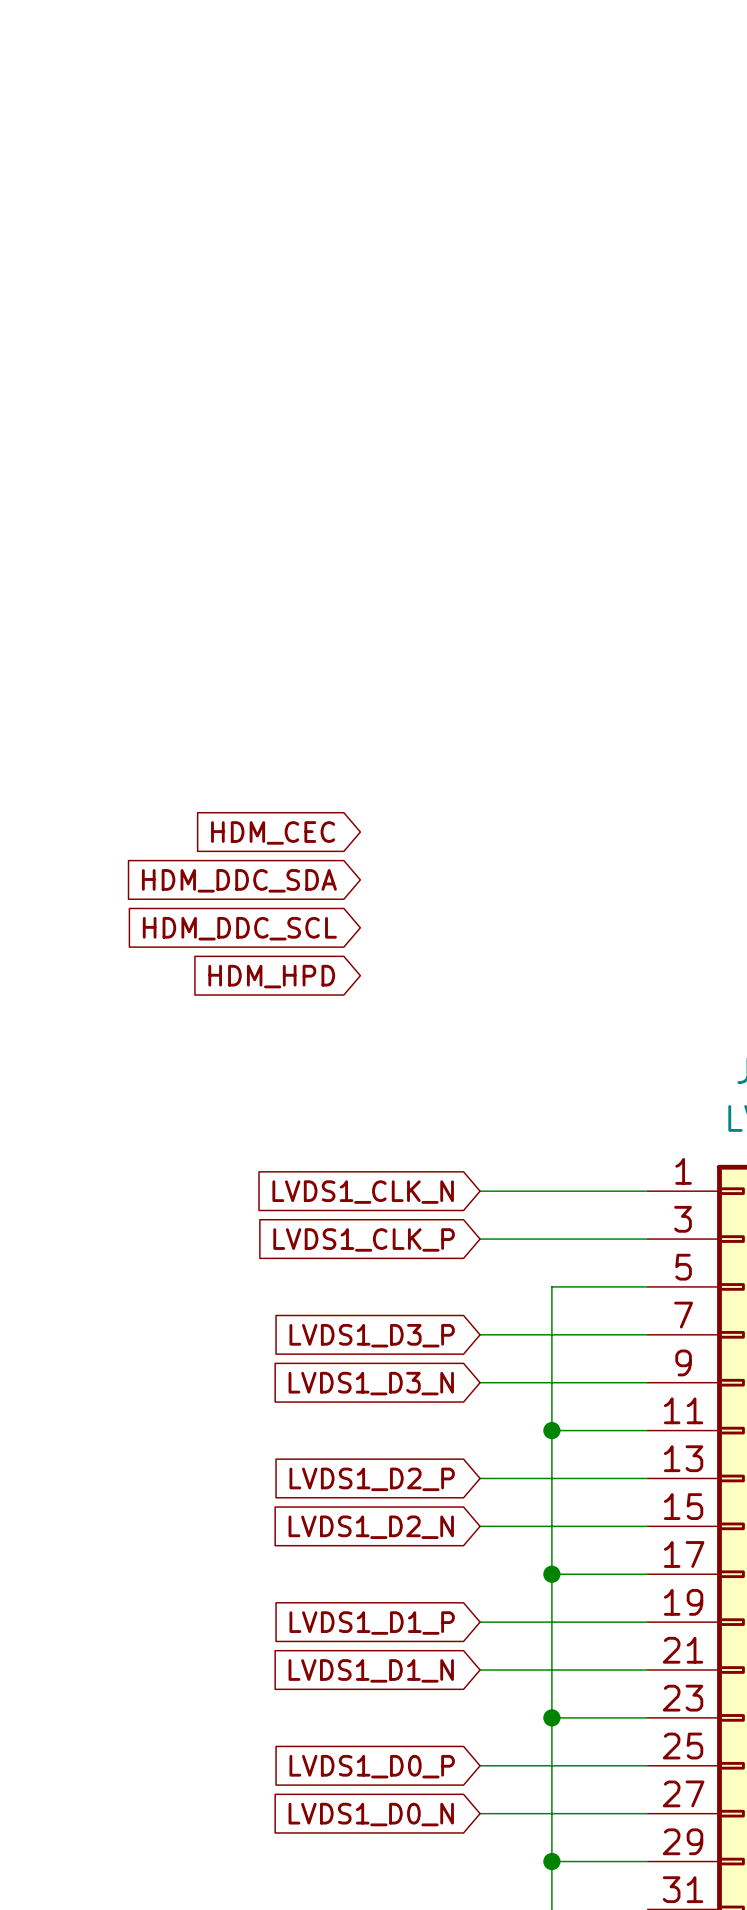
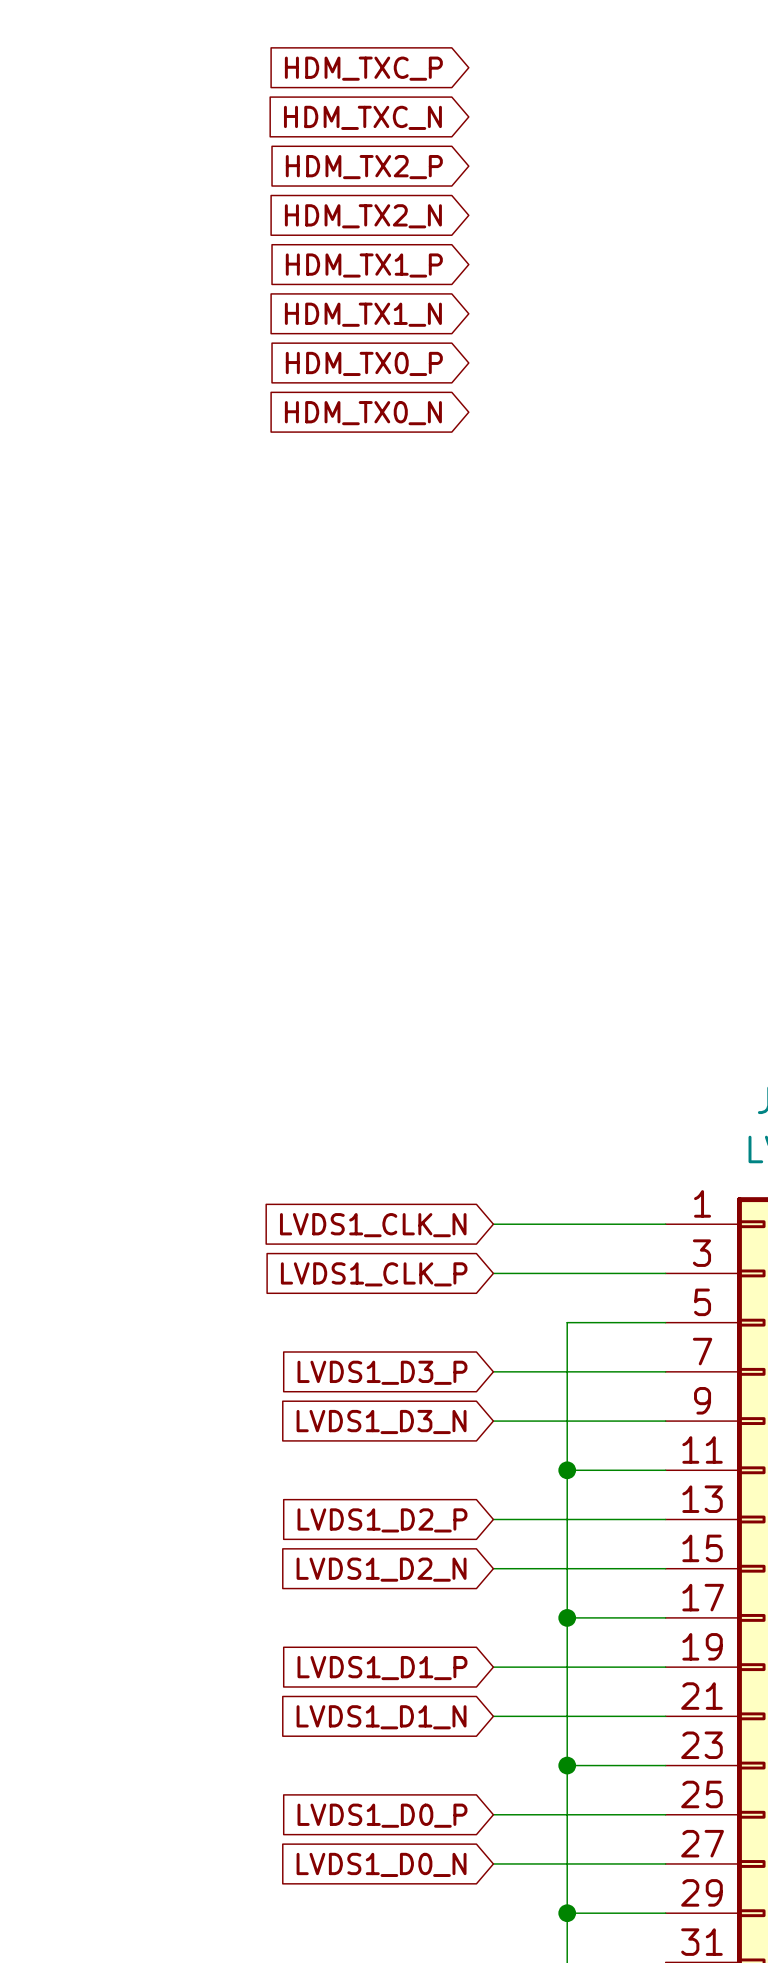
global label: none -> HDM_TXC_P (363, 68)
global label: none -> HDM_TXC_N (362, 117)
global label: none -> HDM_TX2_P (364, 167)
global label: none -> HDM_TX2_N (363, 216)
global label: none -> HDM_TX1_P (364, 265)
global label: none -> HDM_TX1_N (363, 314)
global label: none -> HDM_TX0_P (364, 363)
global label: none -> HDM_TX0_N (363, 413)
global label: HDM_CEC (273, 832) -> none
global label: HDM_DDC_SDA (239, 880) -> none
global label: HDM_DDC_SCL (239, 928) -> none
global label: HDM_HPD (271, 976) -> none

